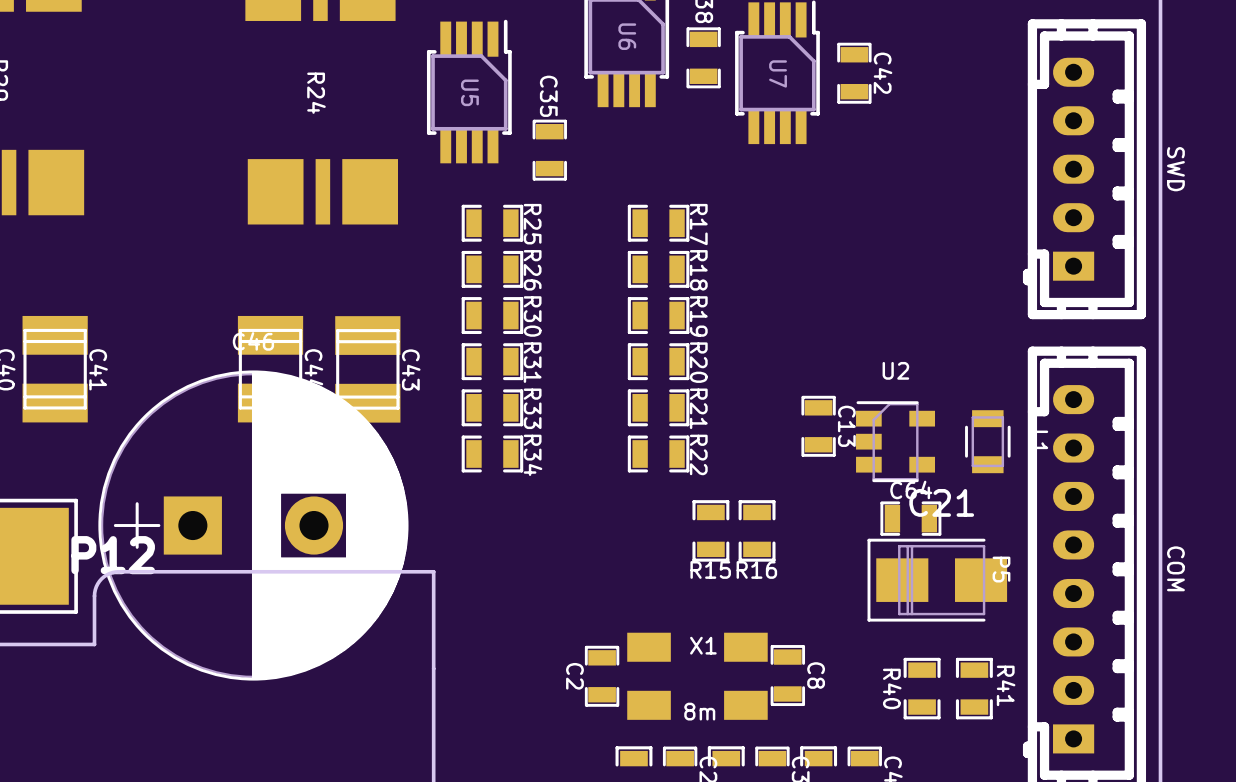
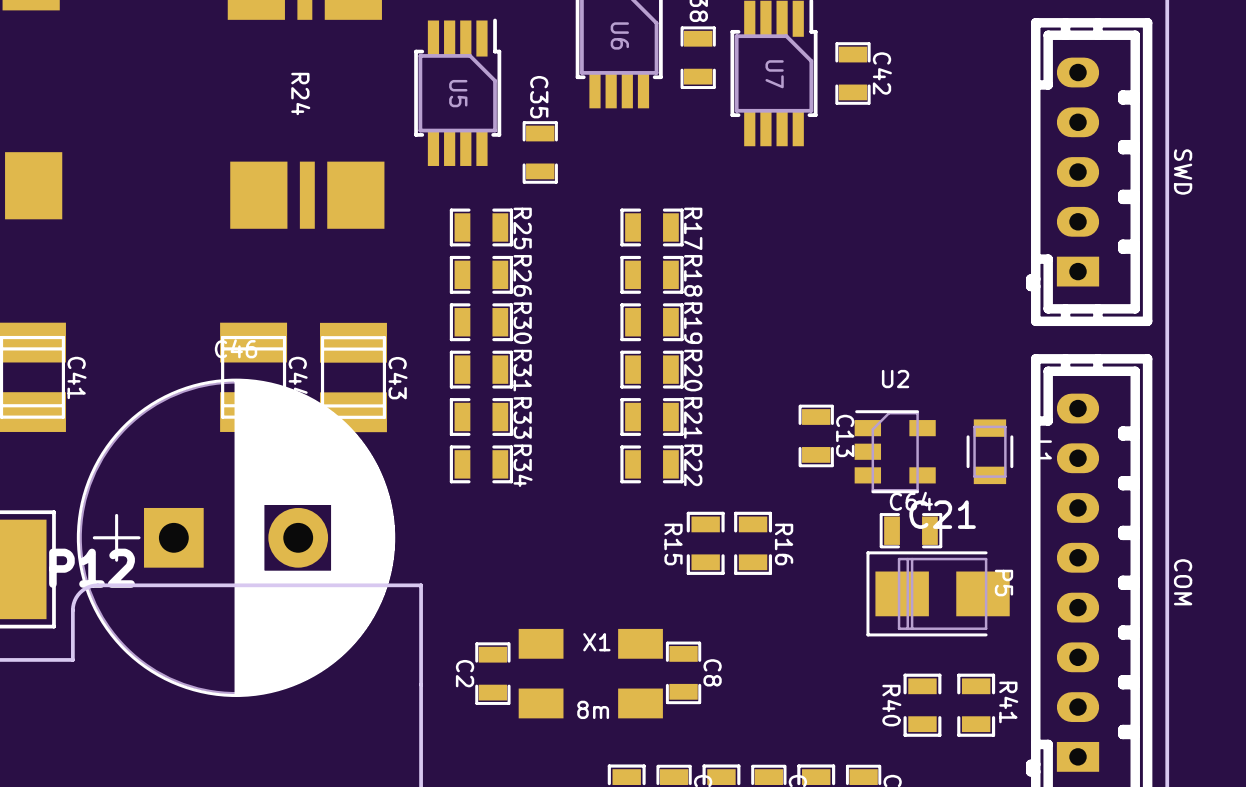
R15 name rotation: 0° (710, 569) -> 90° clockwise (673, 544)
R16 name rotation: 0° (756, 569) -> 90° clockwise (784, 544)
C8 position: (787, 675) -> (683, 672)
C2 position: (602, 676) -> (492, 673)
X1 position: (697, 676) -> (590, 673)

